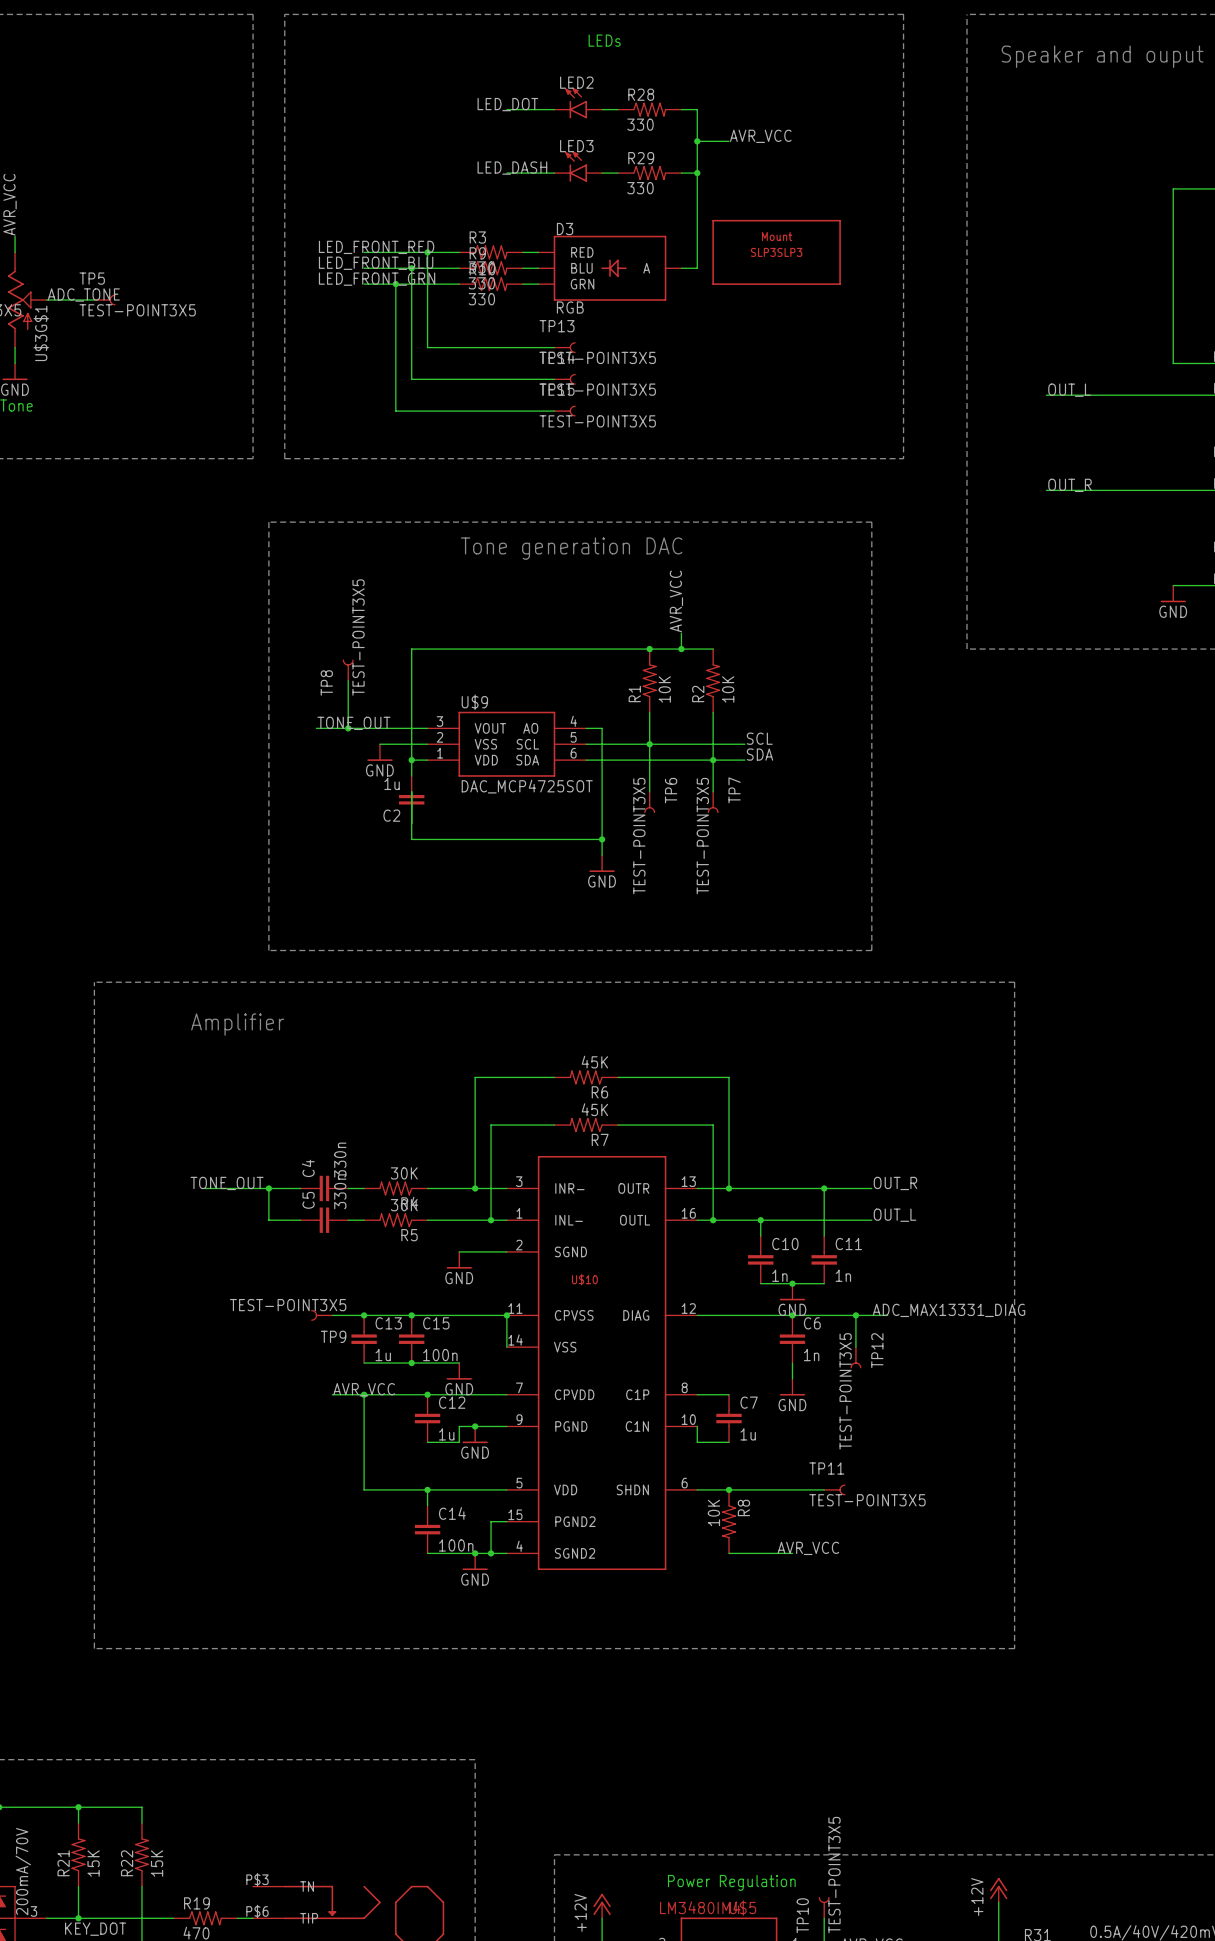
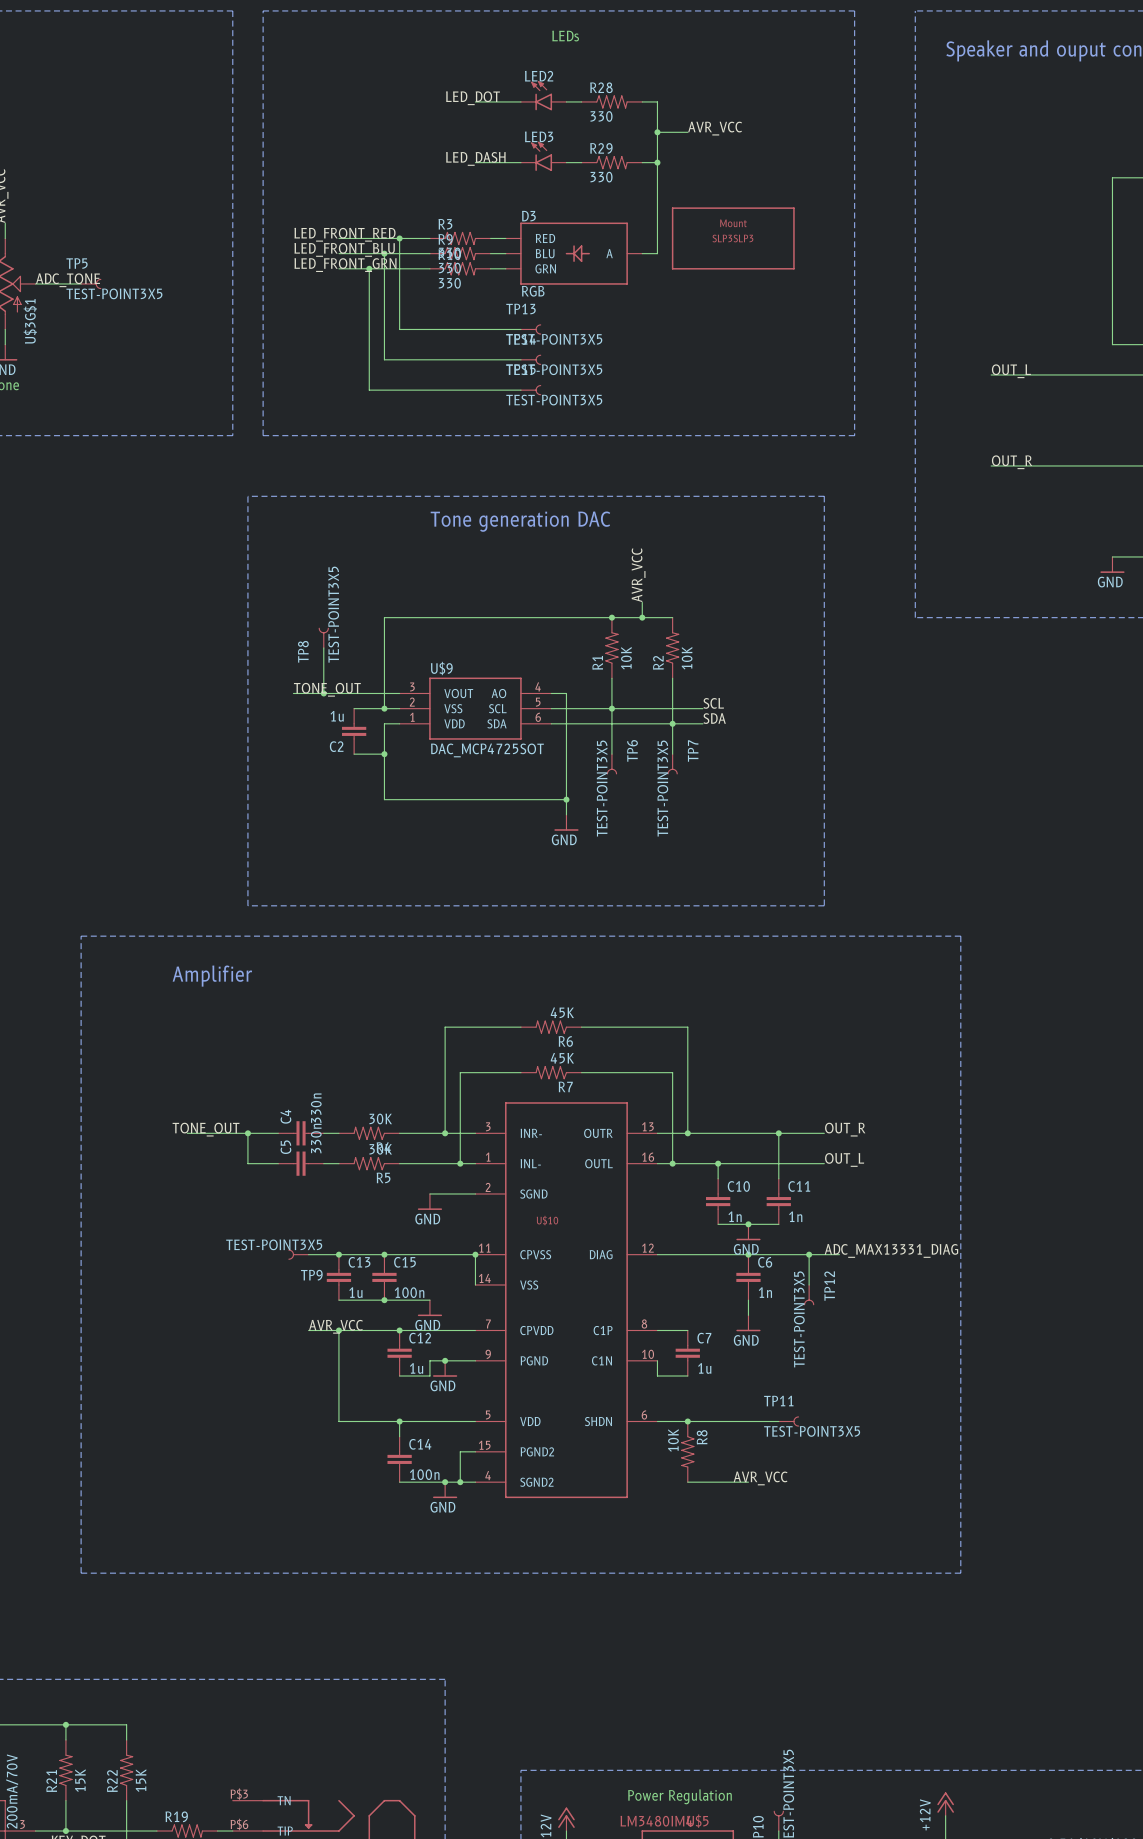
wire: (411, 744) (411, 760) -> none
junction: none -> (384, 708)
power symbol: GND (379, 752) -> none
junction: (411, 760) -> none
wire: none -> (384, 738) (384, 754) (354, 754)
junction: none -> (384, 754)
C2 position: (411, 799) -> (354, 731)

